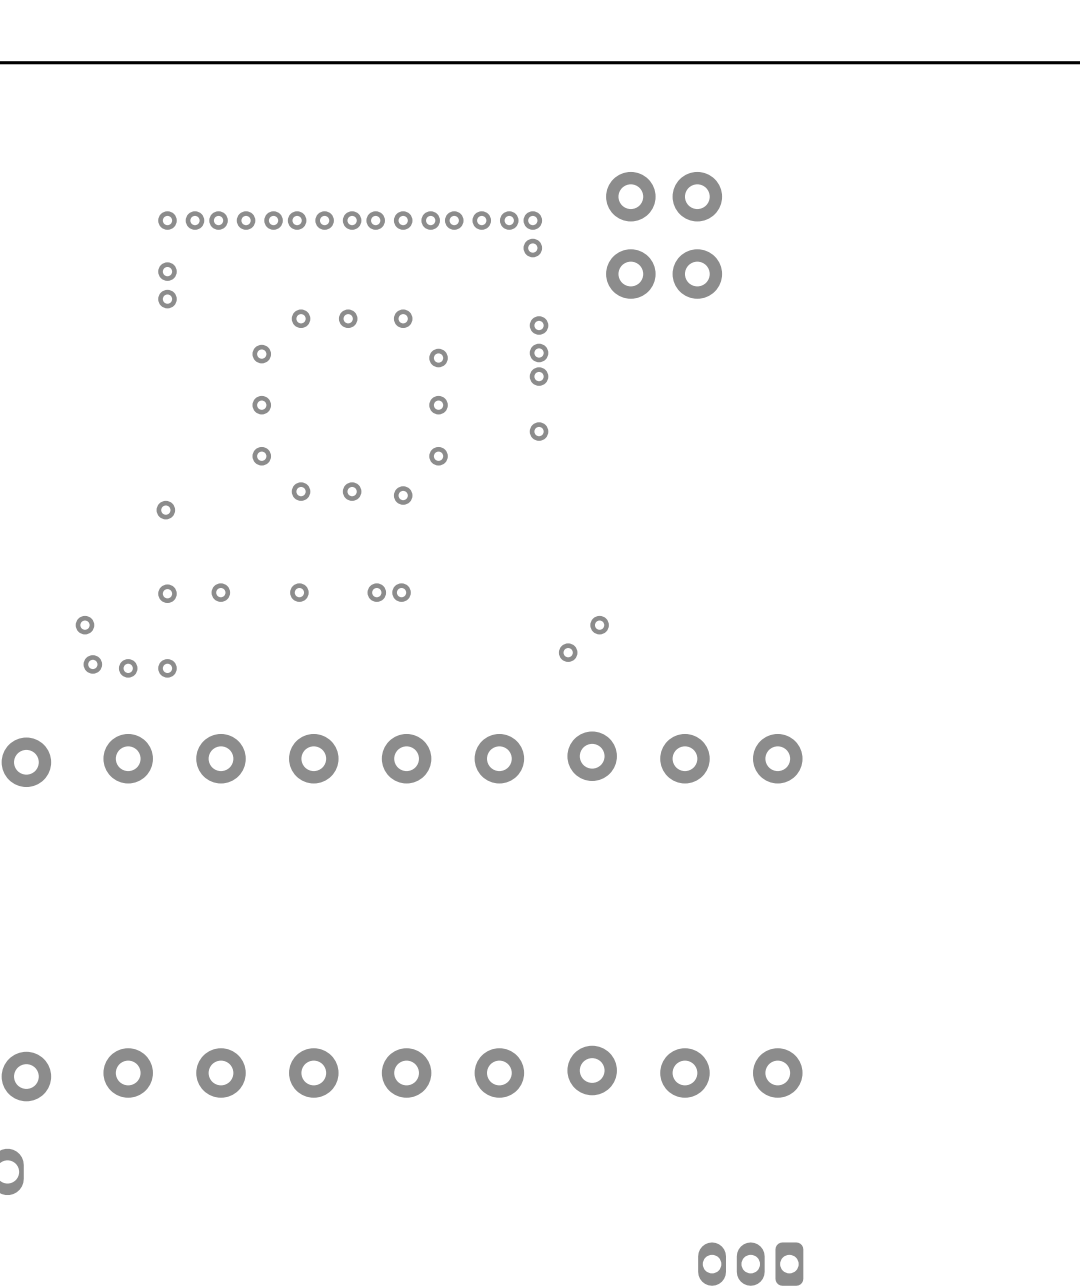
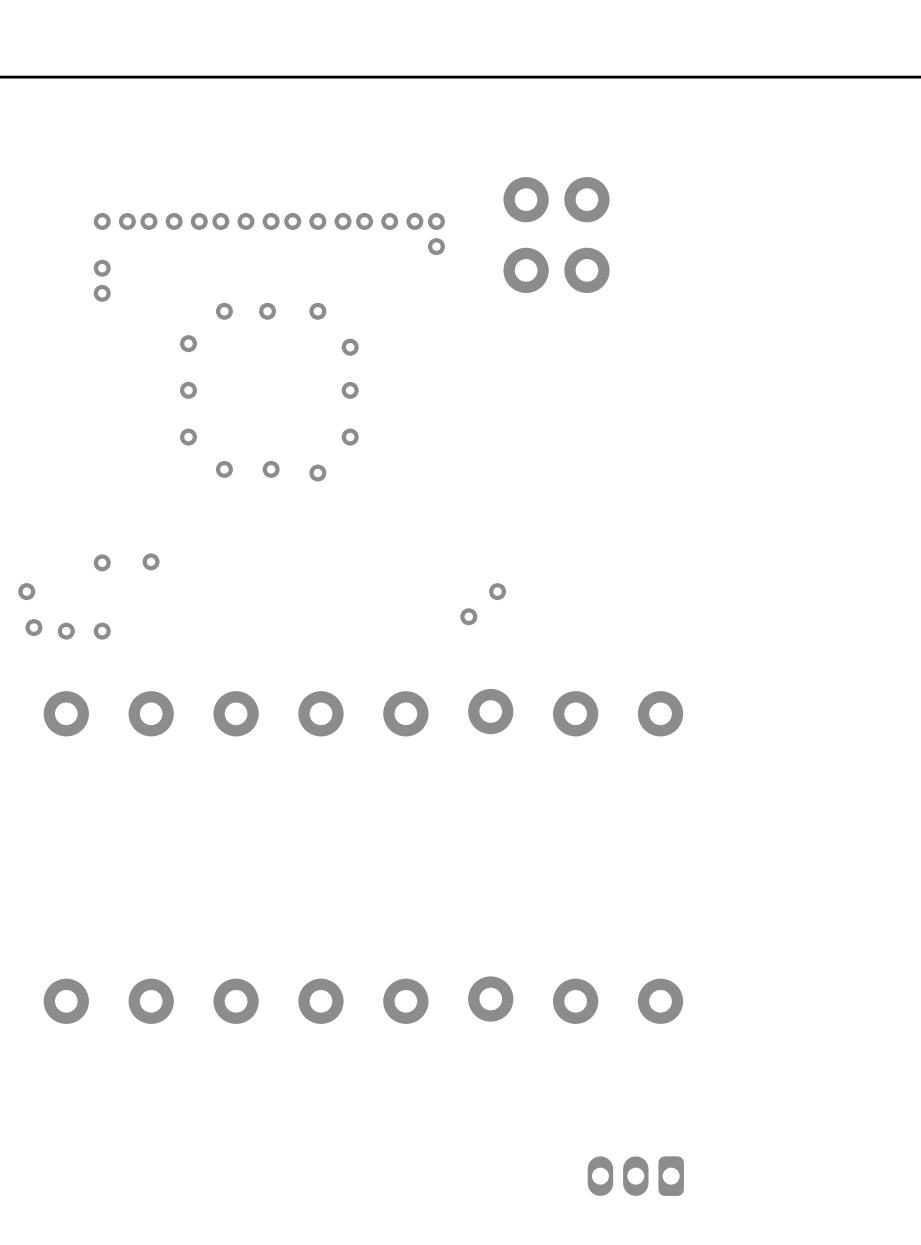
via: (539, 325) -> none
via: (539, 352) -> none
via: (539, 376) -> none
via: (539, 431) -> none
via: (165, 510) -> none
via: (299, 592) -> none
via: (376, 592) -> none
via: (401, 592) -> none

